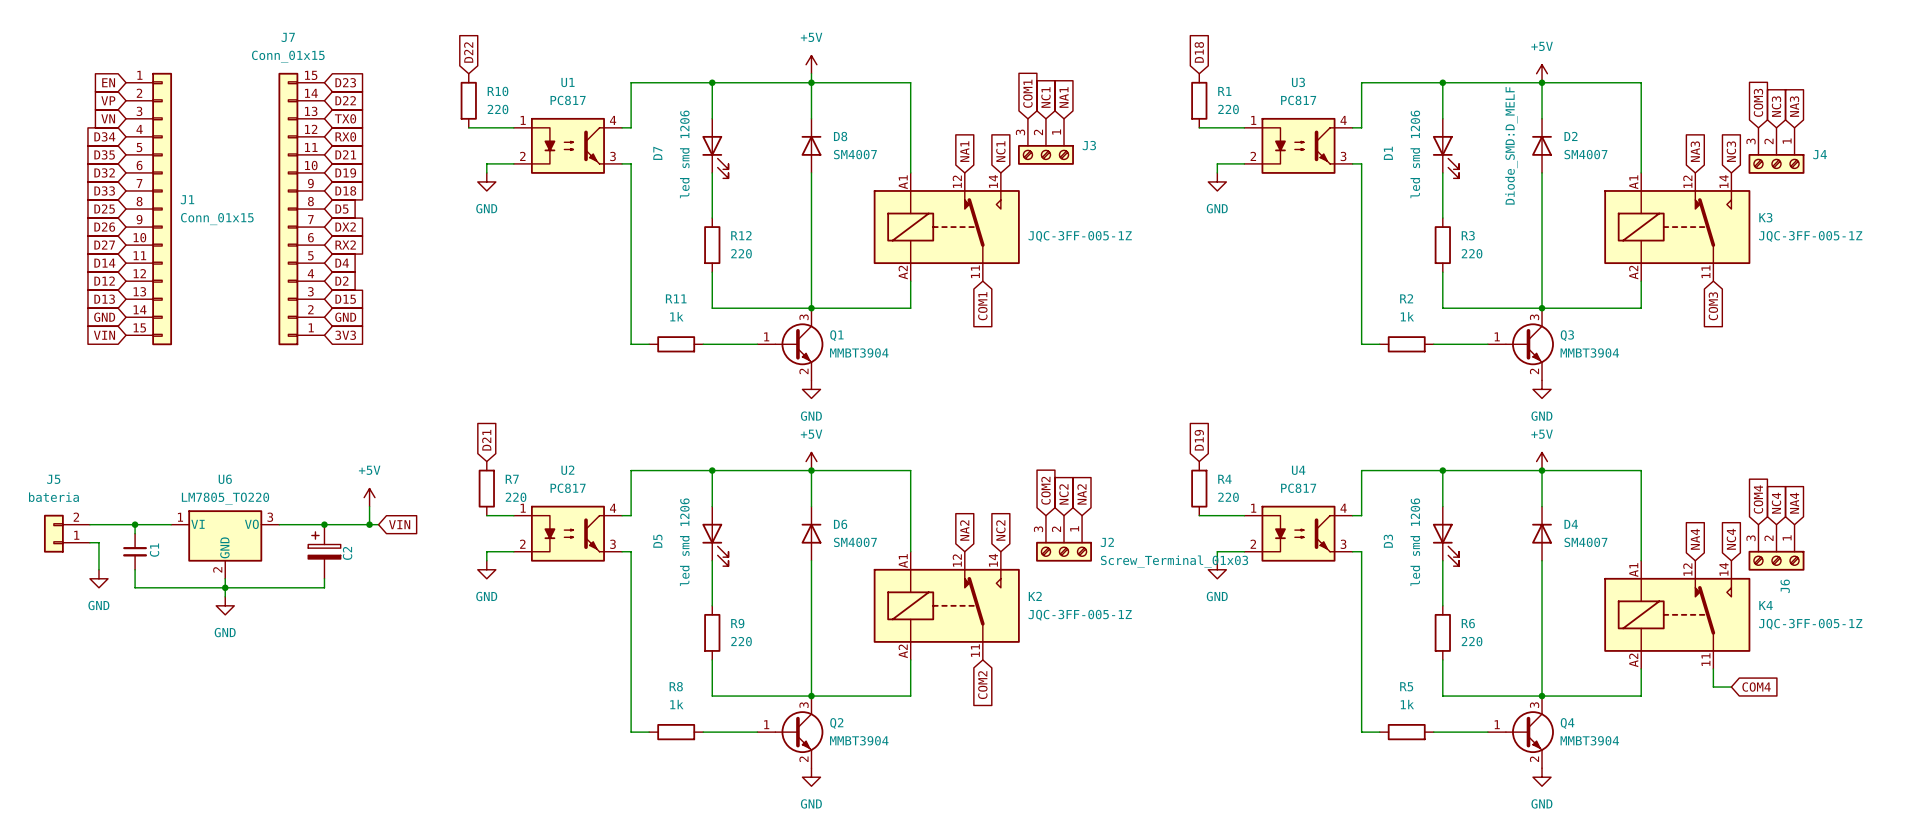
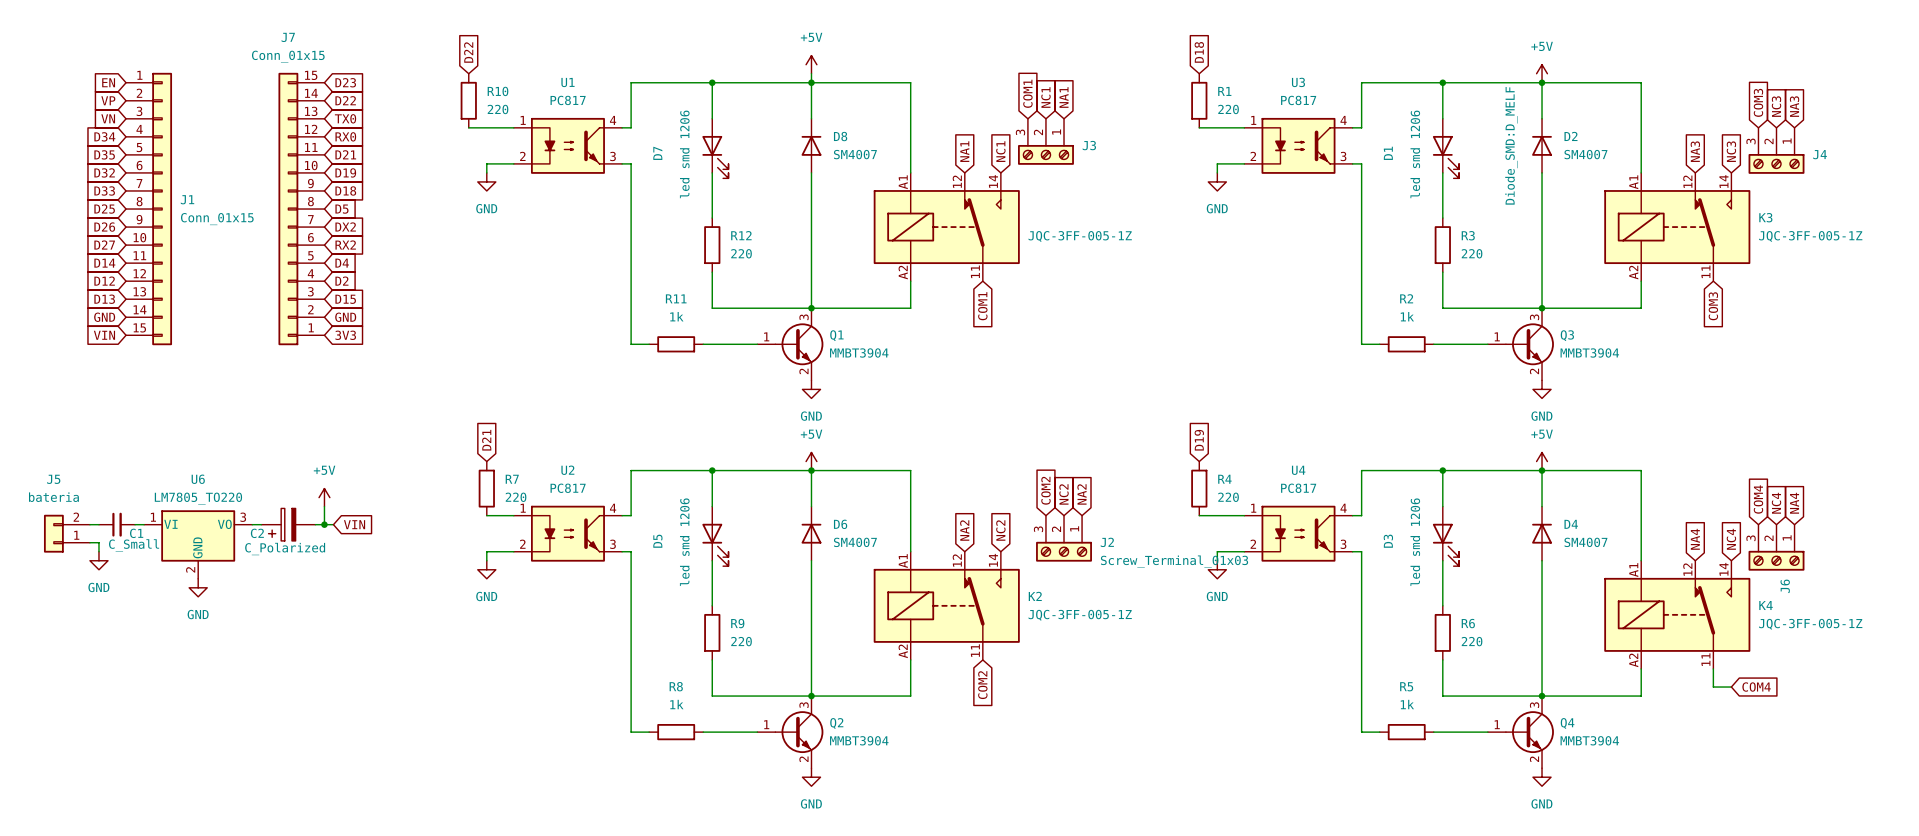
power symbol position: +5V (369, 497) -> +5V (324, 497)
wire: (369, 506) (369, 524) -> (324, 506) (324, 524)
junction: (135, 524) -> none
wire: (333, 524) (378, 524) -> none
junction: (369, 524) -> none
global label position: VIN (399, 524) -> VIN (354, 524)
U6 position: (225, 544) -> (198, 544)
C1 value: none -> C_Small (134, 545)
C2 rotation: 0° (324, 545) -> 90° counterclockwise (282, 524)
C2 value: none -> C_Polarized (285, 549)
C1 rotation: 0° (135, 551) -> 90° counterclockwise (117, 524)
C1 position: (135, 551) -> (117, 524)
C2 position: (324, 551) -> (288, 524)
C2 name position: C2 (347, 553) -> C2 (257, 533)
wire: (135, 569) (135, 587) (324, 587) (324, 578) -> none
power symbol position: GND (98, 578) -> GND (98, 560)
wire: (225, 578) (225, 596) -> none
junction: (225, 587) -> none
power symbol position: GND (225, 605) -> GND (198, 587)

